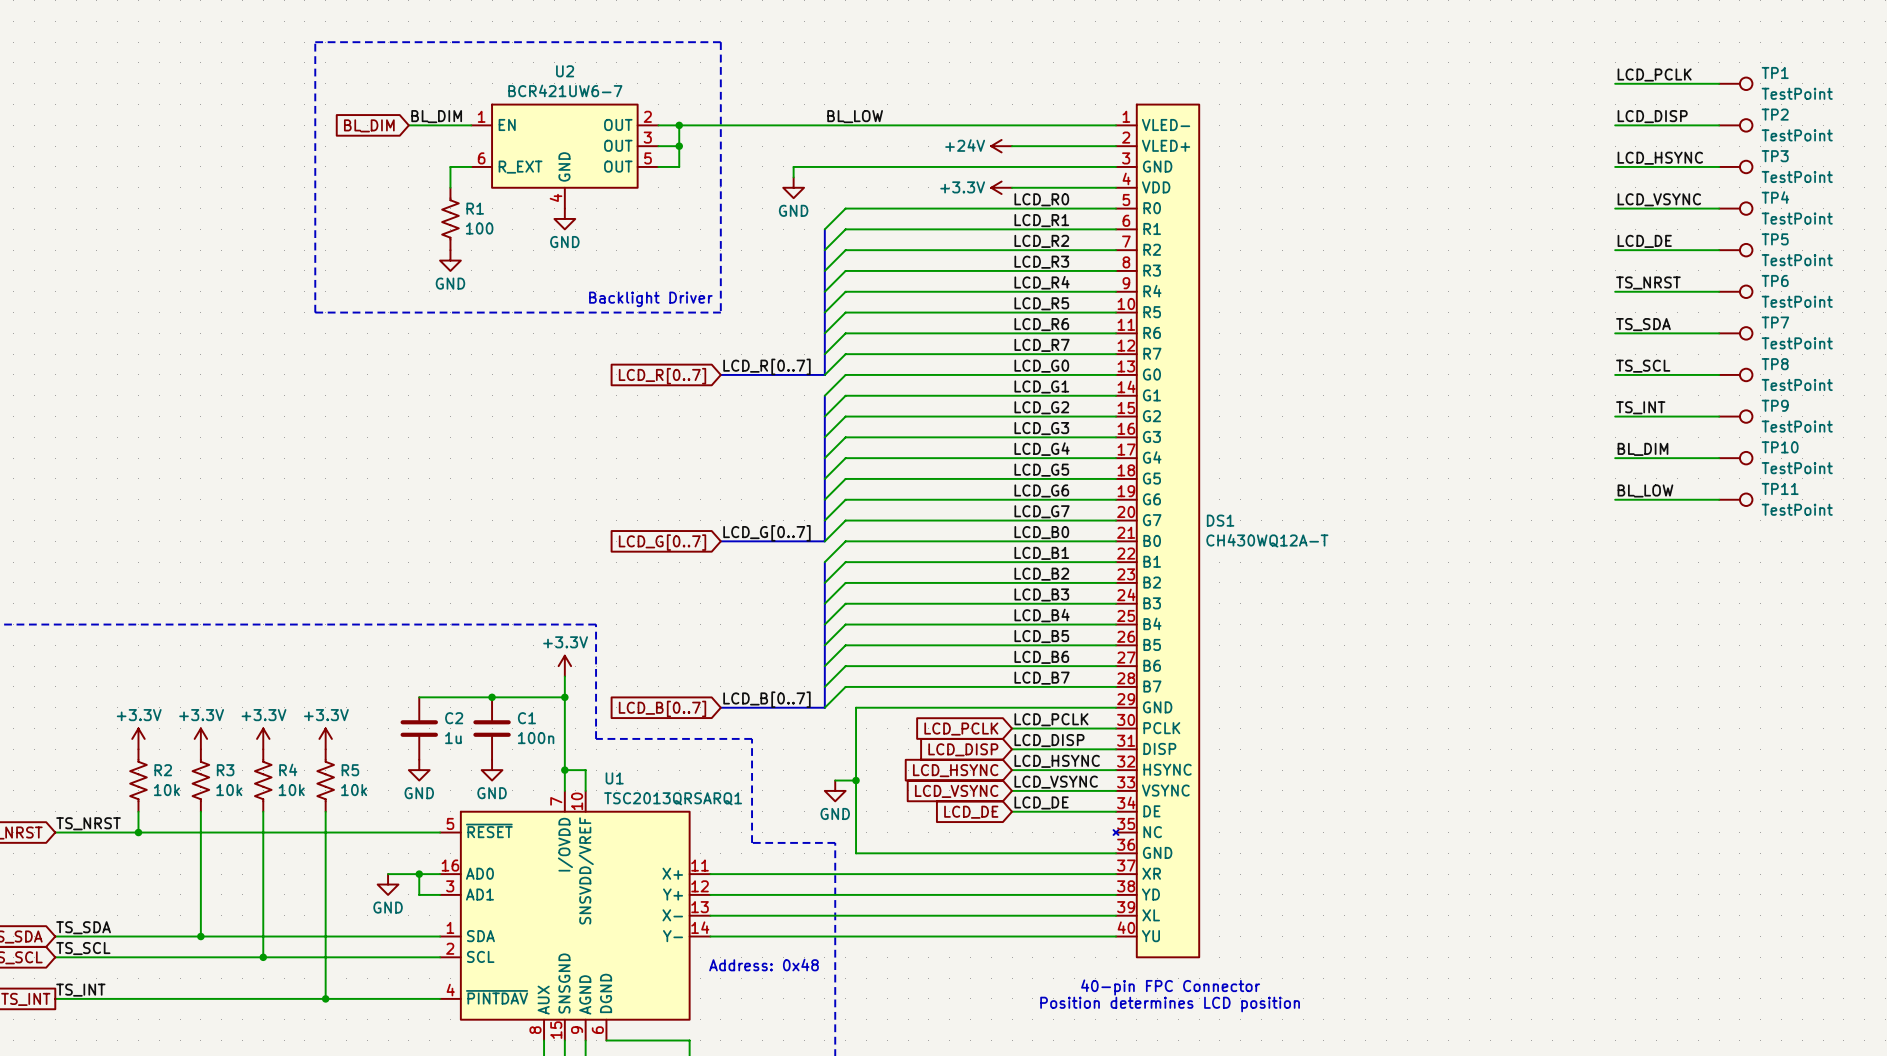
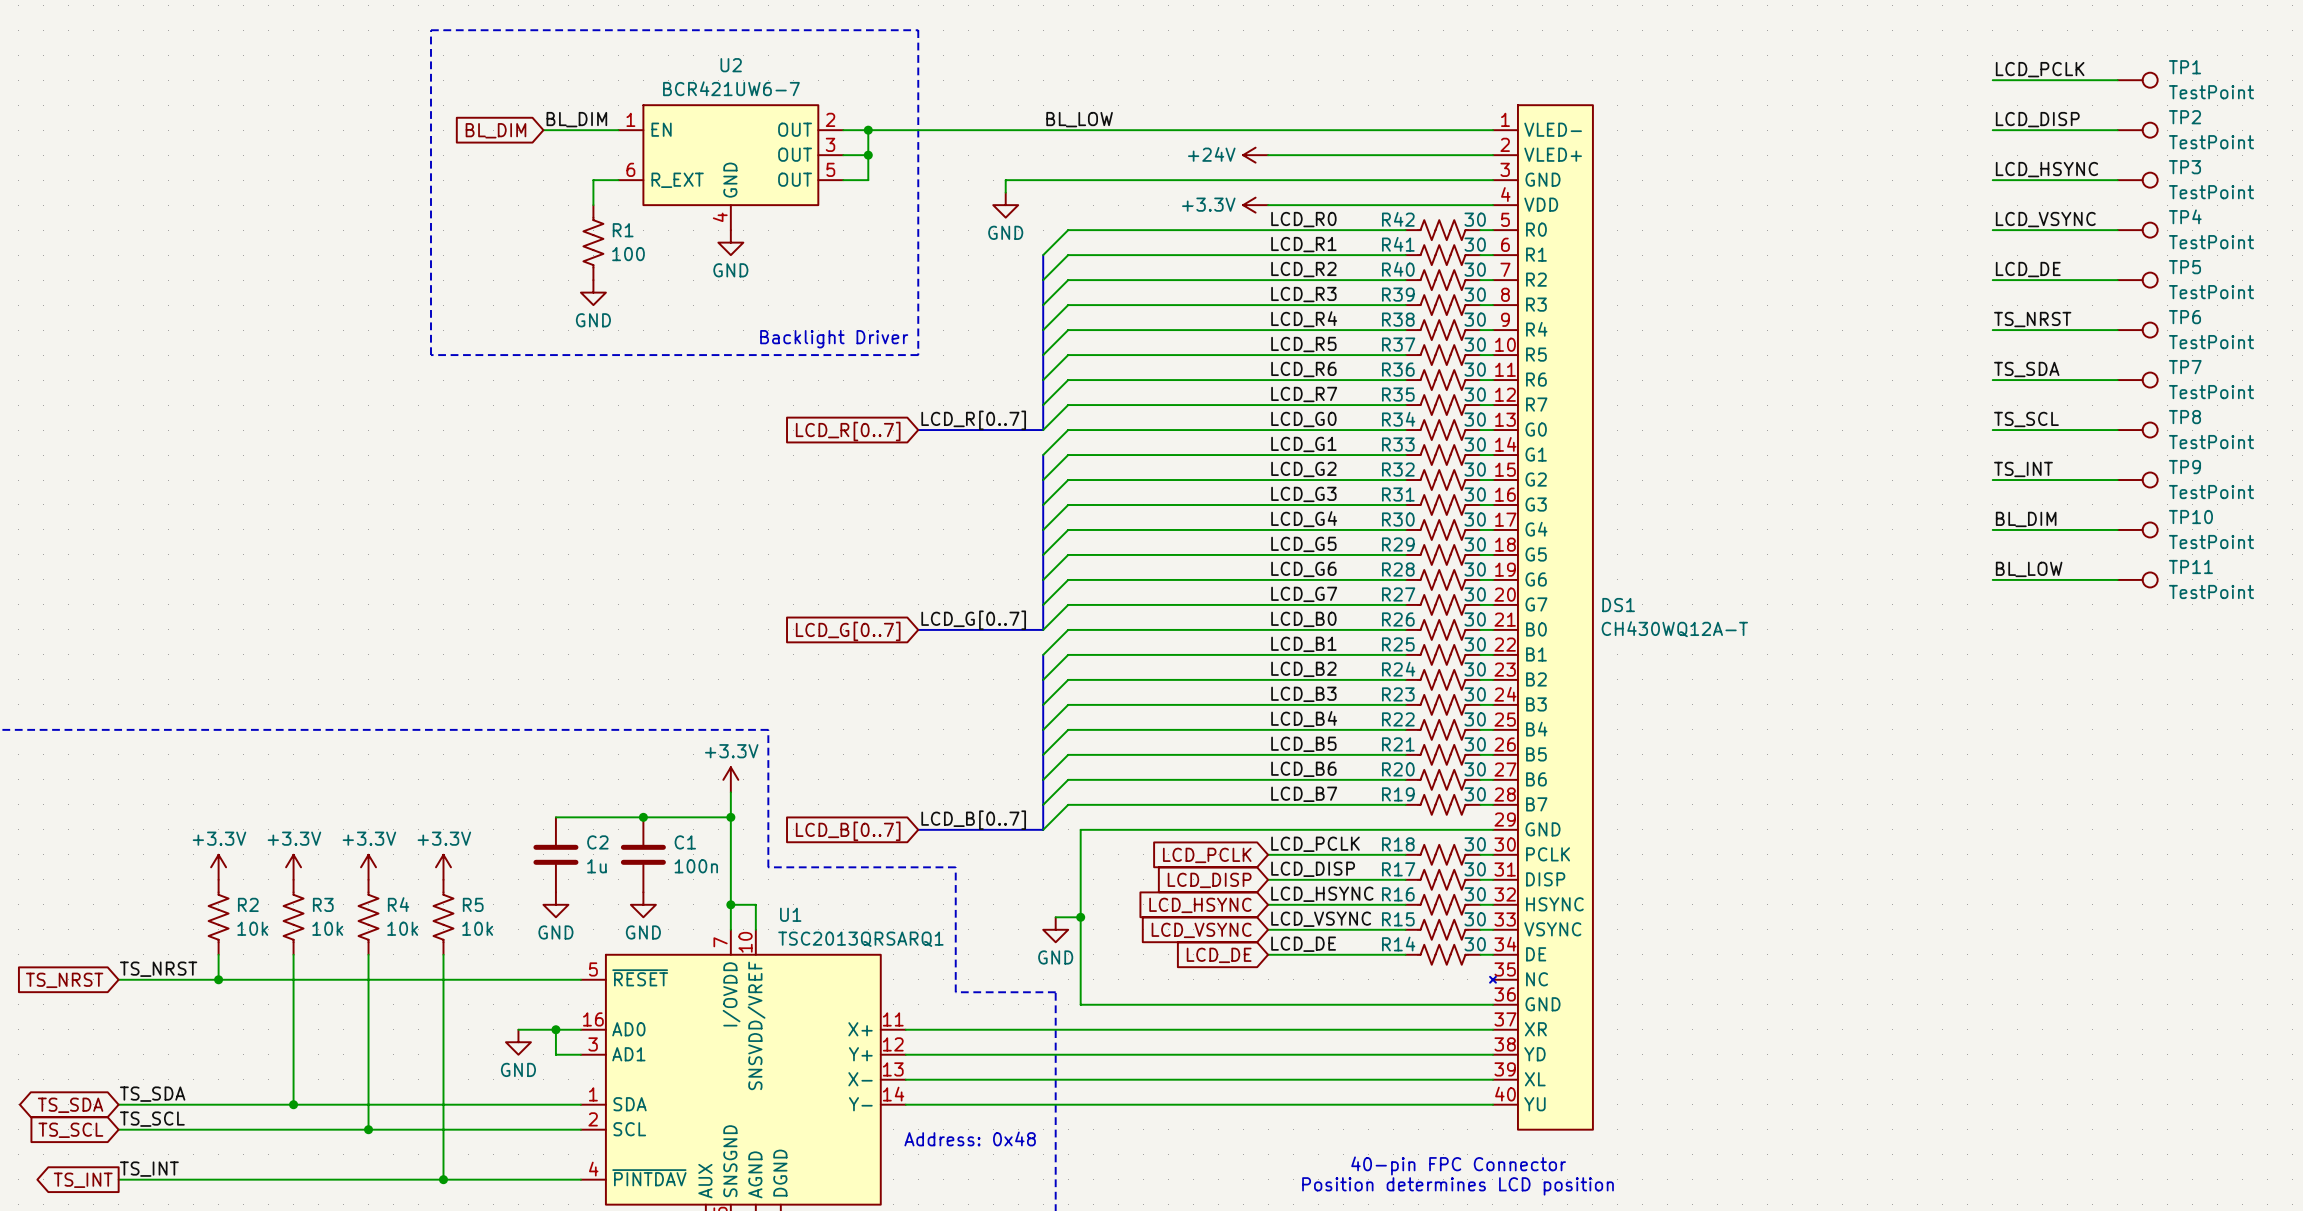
R42: none -> 30 (1443, 230)
R41: none -> 30 (1443, 255)
R40: none -> 30 (1443, 280)
R39: none -> 30 (1443, 305)
R38: none -> 30 (1443, 330)
R37: none -> 30 (1443, 355)
R36: none -> 30 (1443, 380)
R35: none -> 30 (1443, 405)
R34: none -> 30 (1443, 430)
R33: none -> 30 (1443, 455)
R32: none -> 30 (1443, 480)
R31: none -> 30 (1443, 504)
R30: none -> 30 (1443, 529)
R29: none -> 30 (1443, 554)
R28: none -> 30 (1443, 579)
R27: none -> 30 (1443, 604)
DS1 position: (1156, 530) -> (1541, 617)
R26: none -> 30 (1443, 629)
R25: none -> 30 (1443, 654)
R24: none -> 30 (1443, 679)
R23: none -> 30 (1443, 704)
R22: none -> 30 (1443, 729)
R21: none -> 30 (1443, 754)
R20: none -> 30 (1443, 779)
R19: none -> 30 (1443, 804)
R18: none -> 30 (1443, 854)
R17: none -> 30 (1443, 879)
R16: none -> 30 (1443, 904)
R15: none -> 30 (1443, 929)
R14: none -> 30 (1443, 954)

